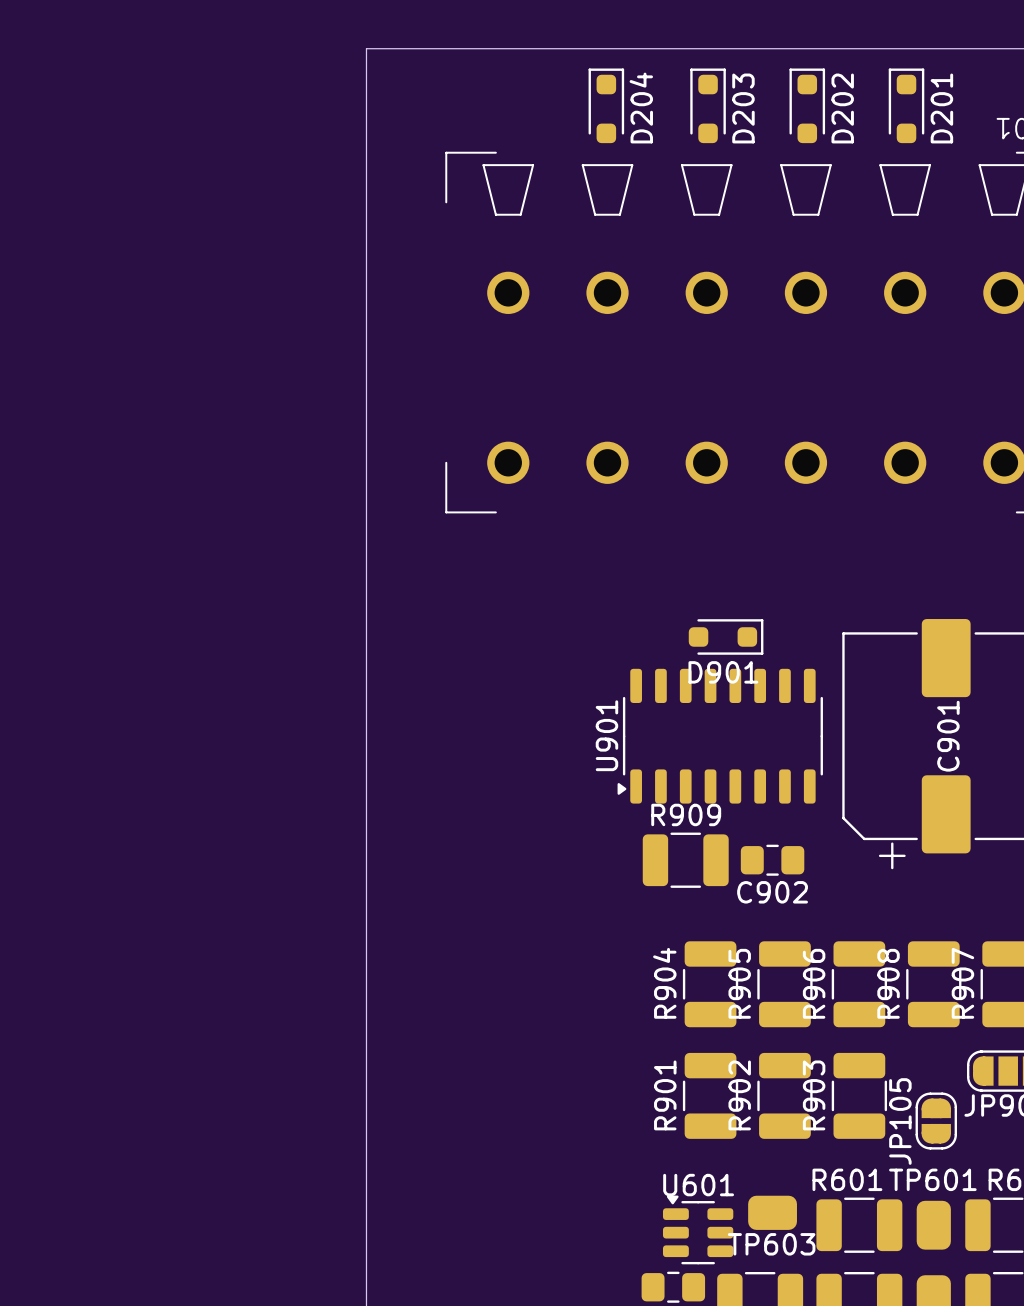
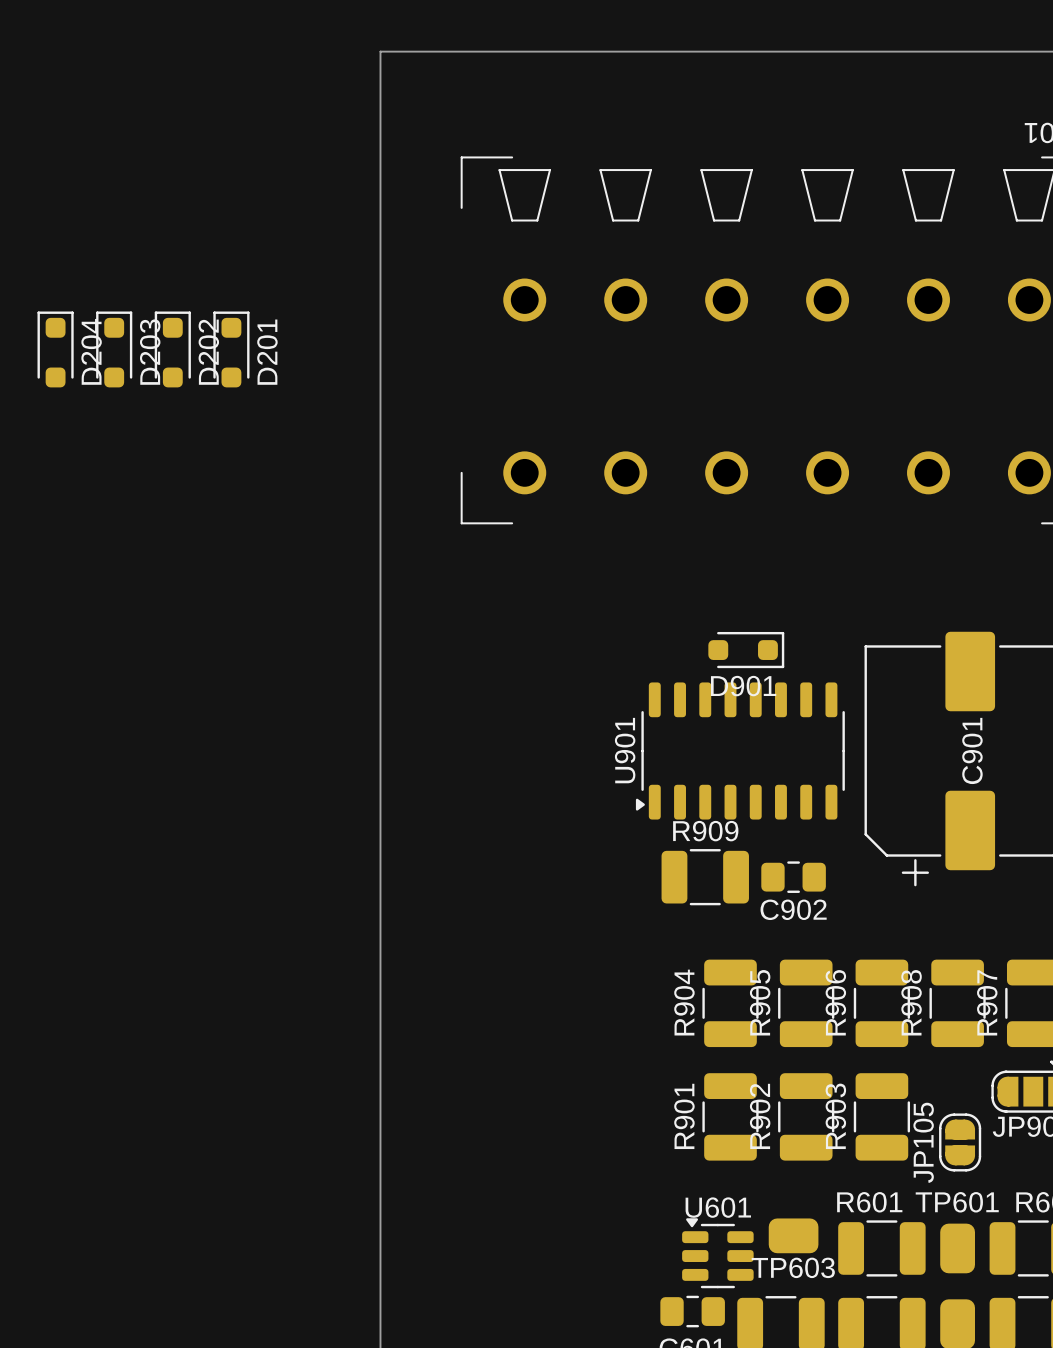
D204 position: (606, 105) -> (55, 349)
D203 position: (708, 105) -> (114, 349)
D202 position: (807, 105) -> (172, 349)
D201 position: (906, 105) -> (231, 349)

